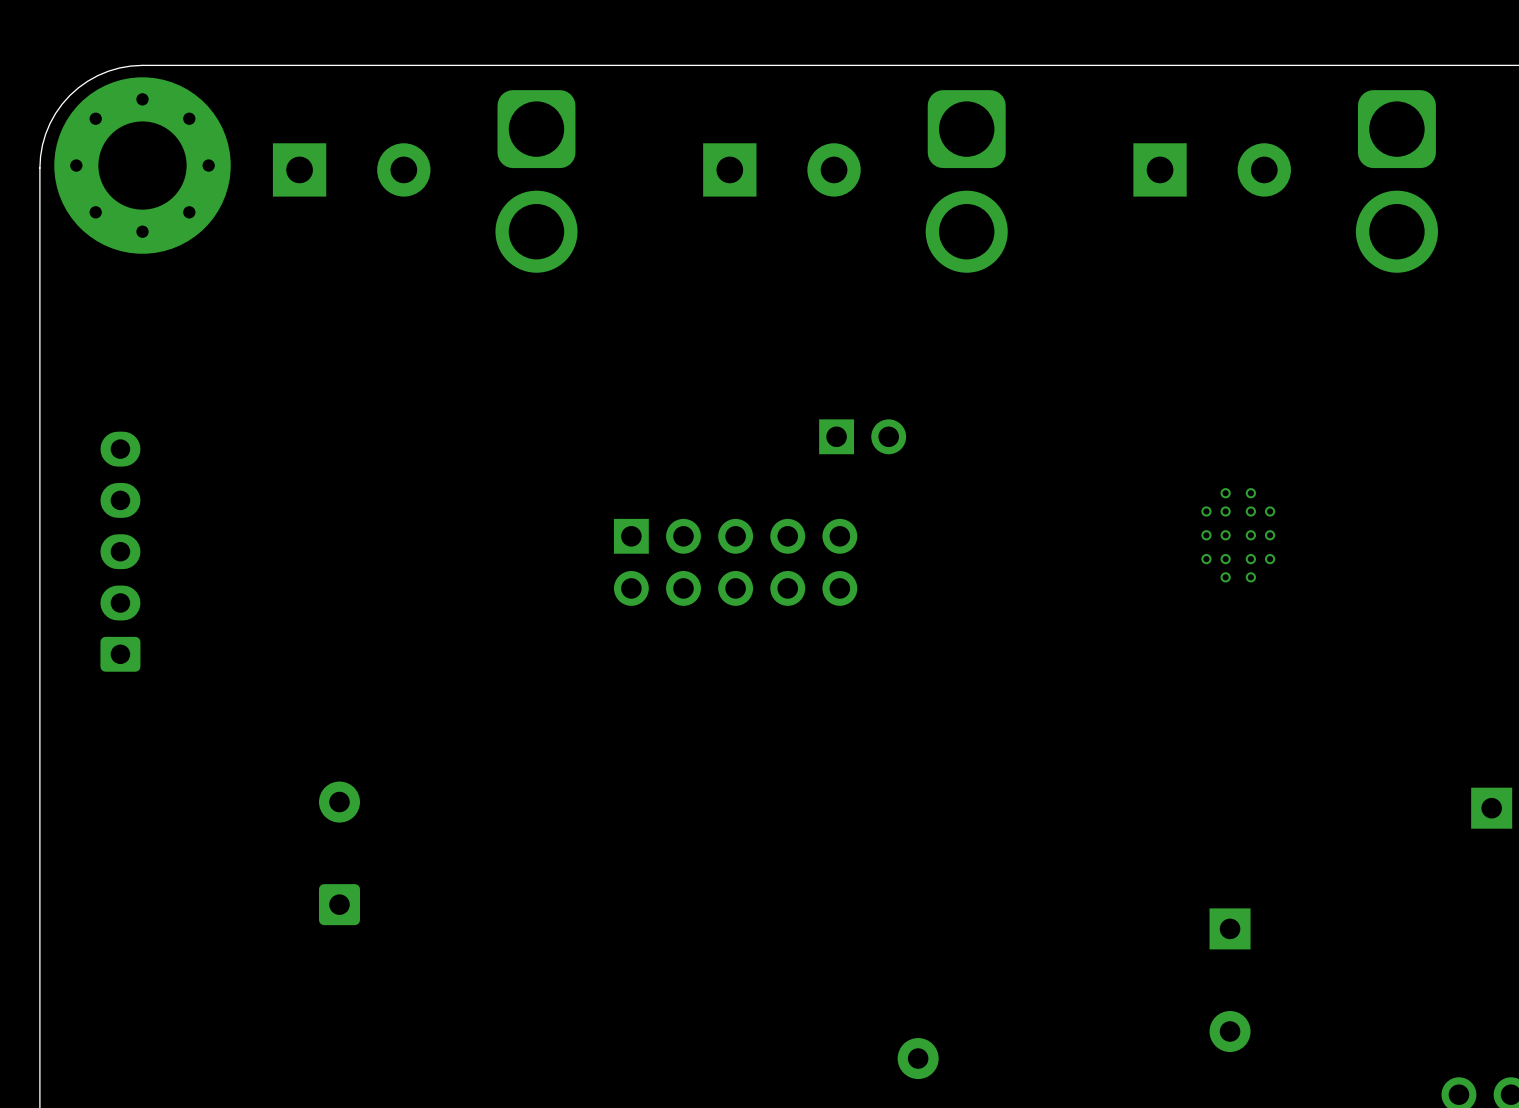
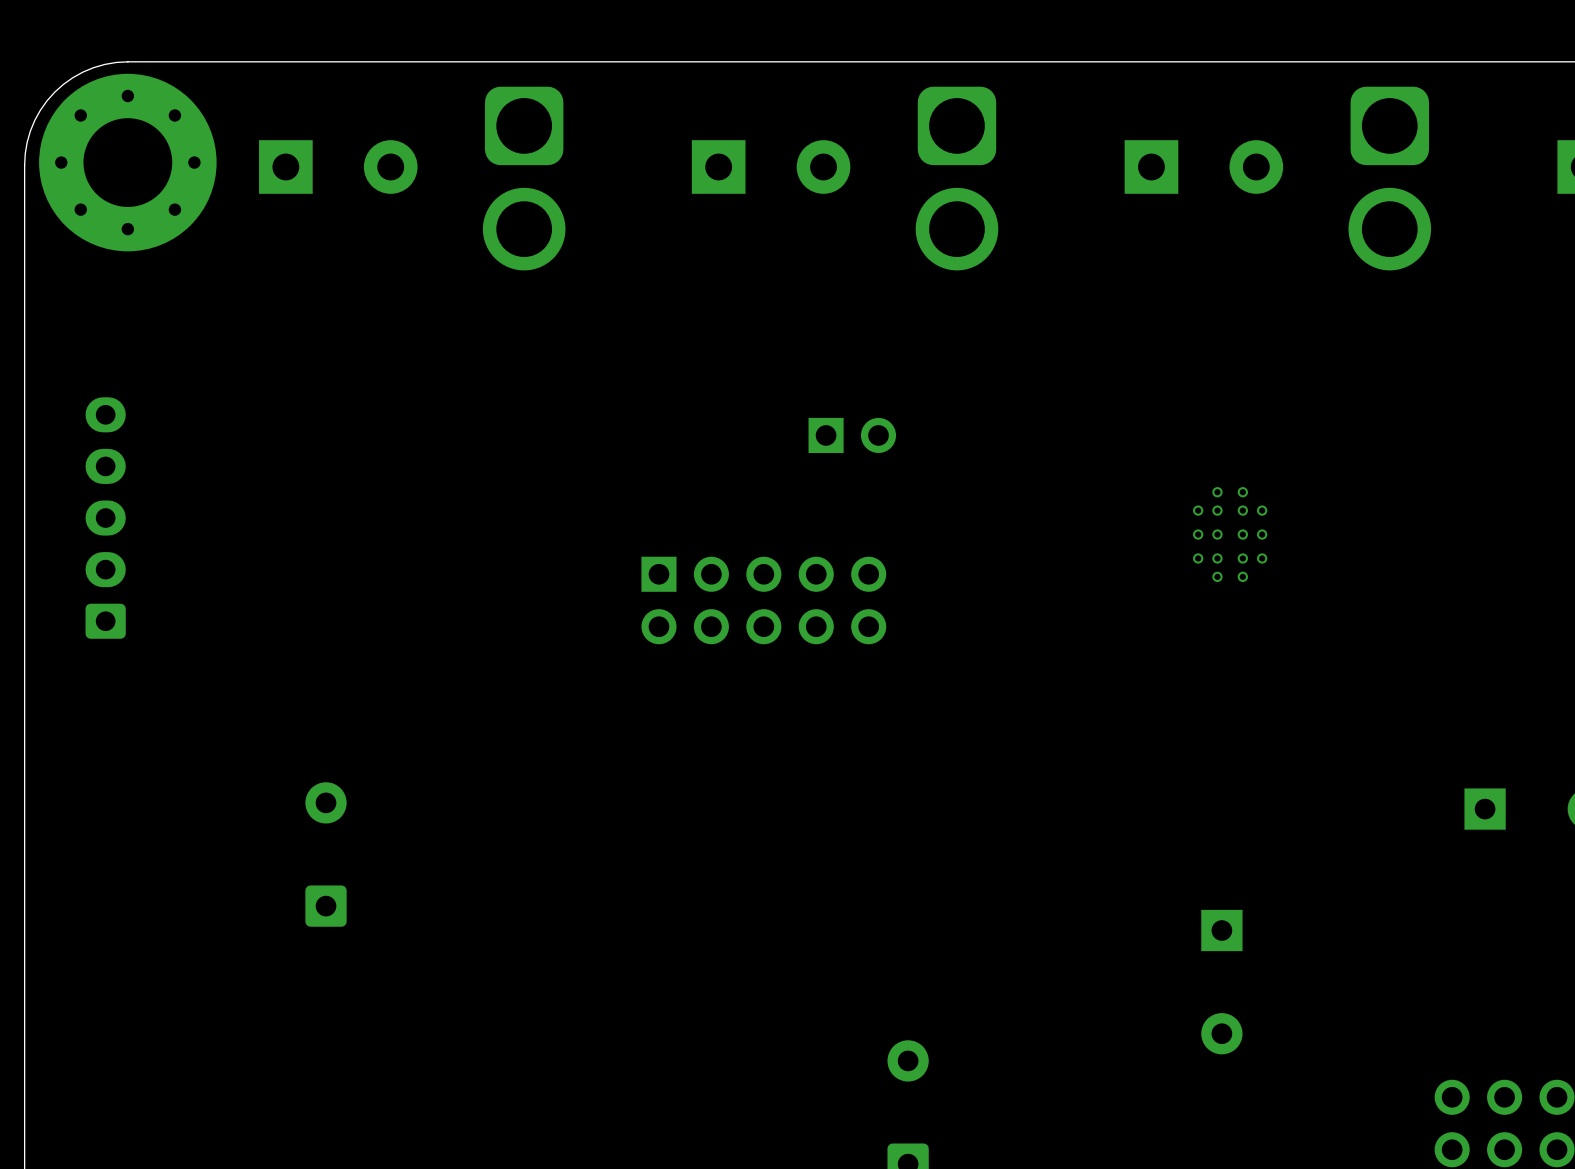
part position: (120, 551) -> (105, 518)
part position: (735, 562) -> (763, 600)

